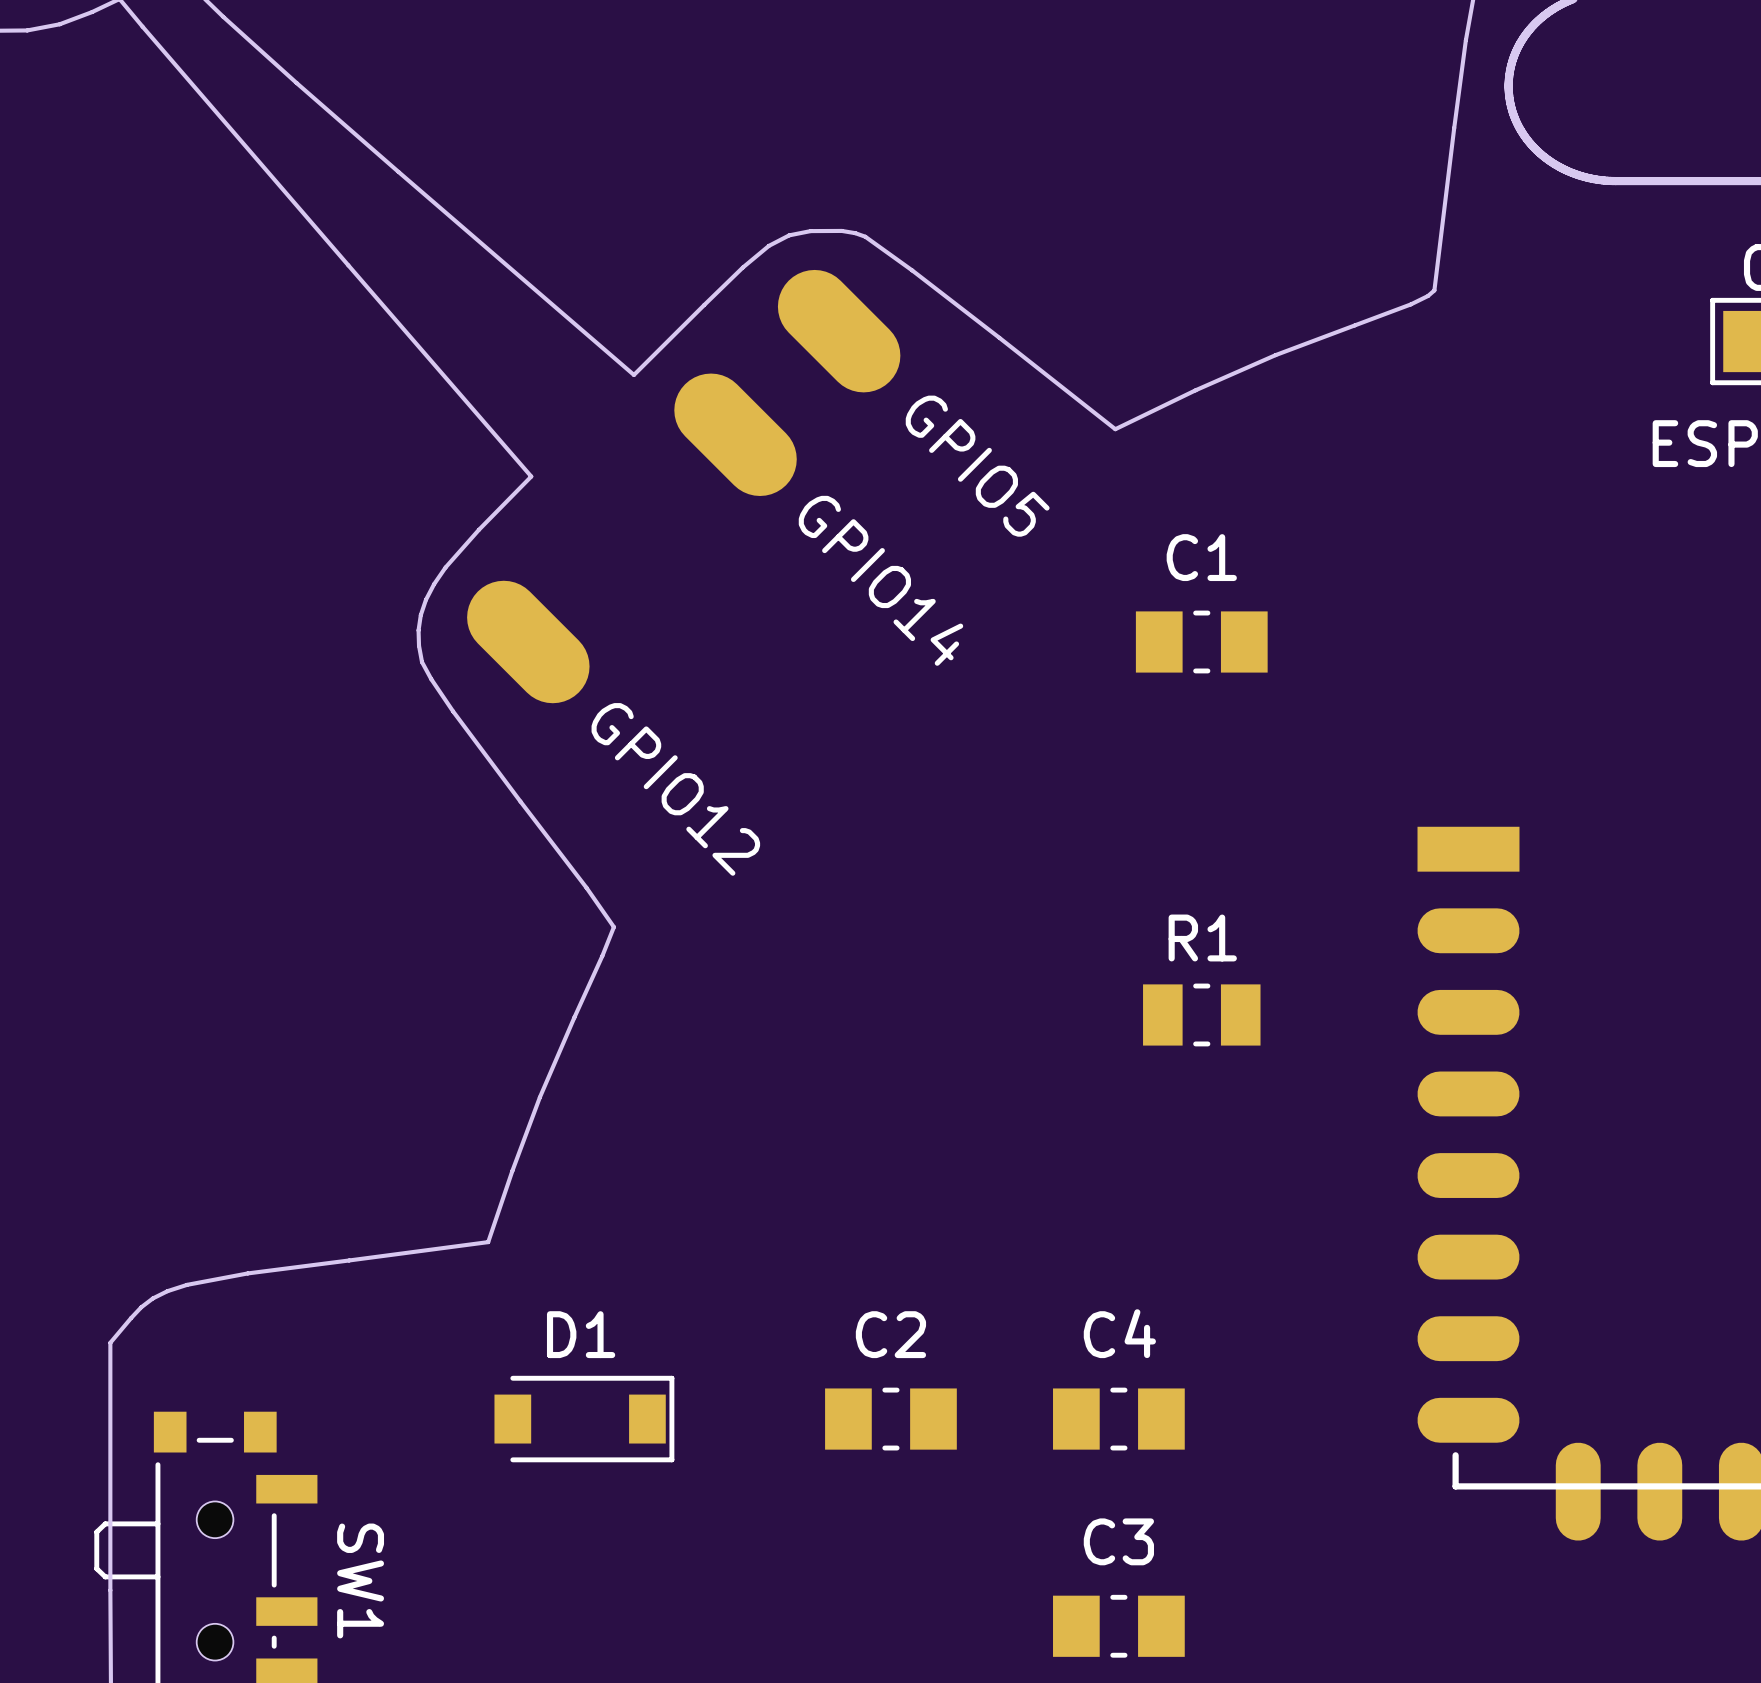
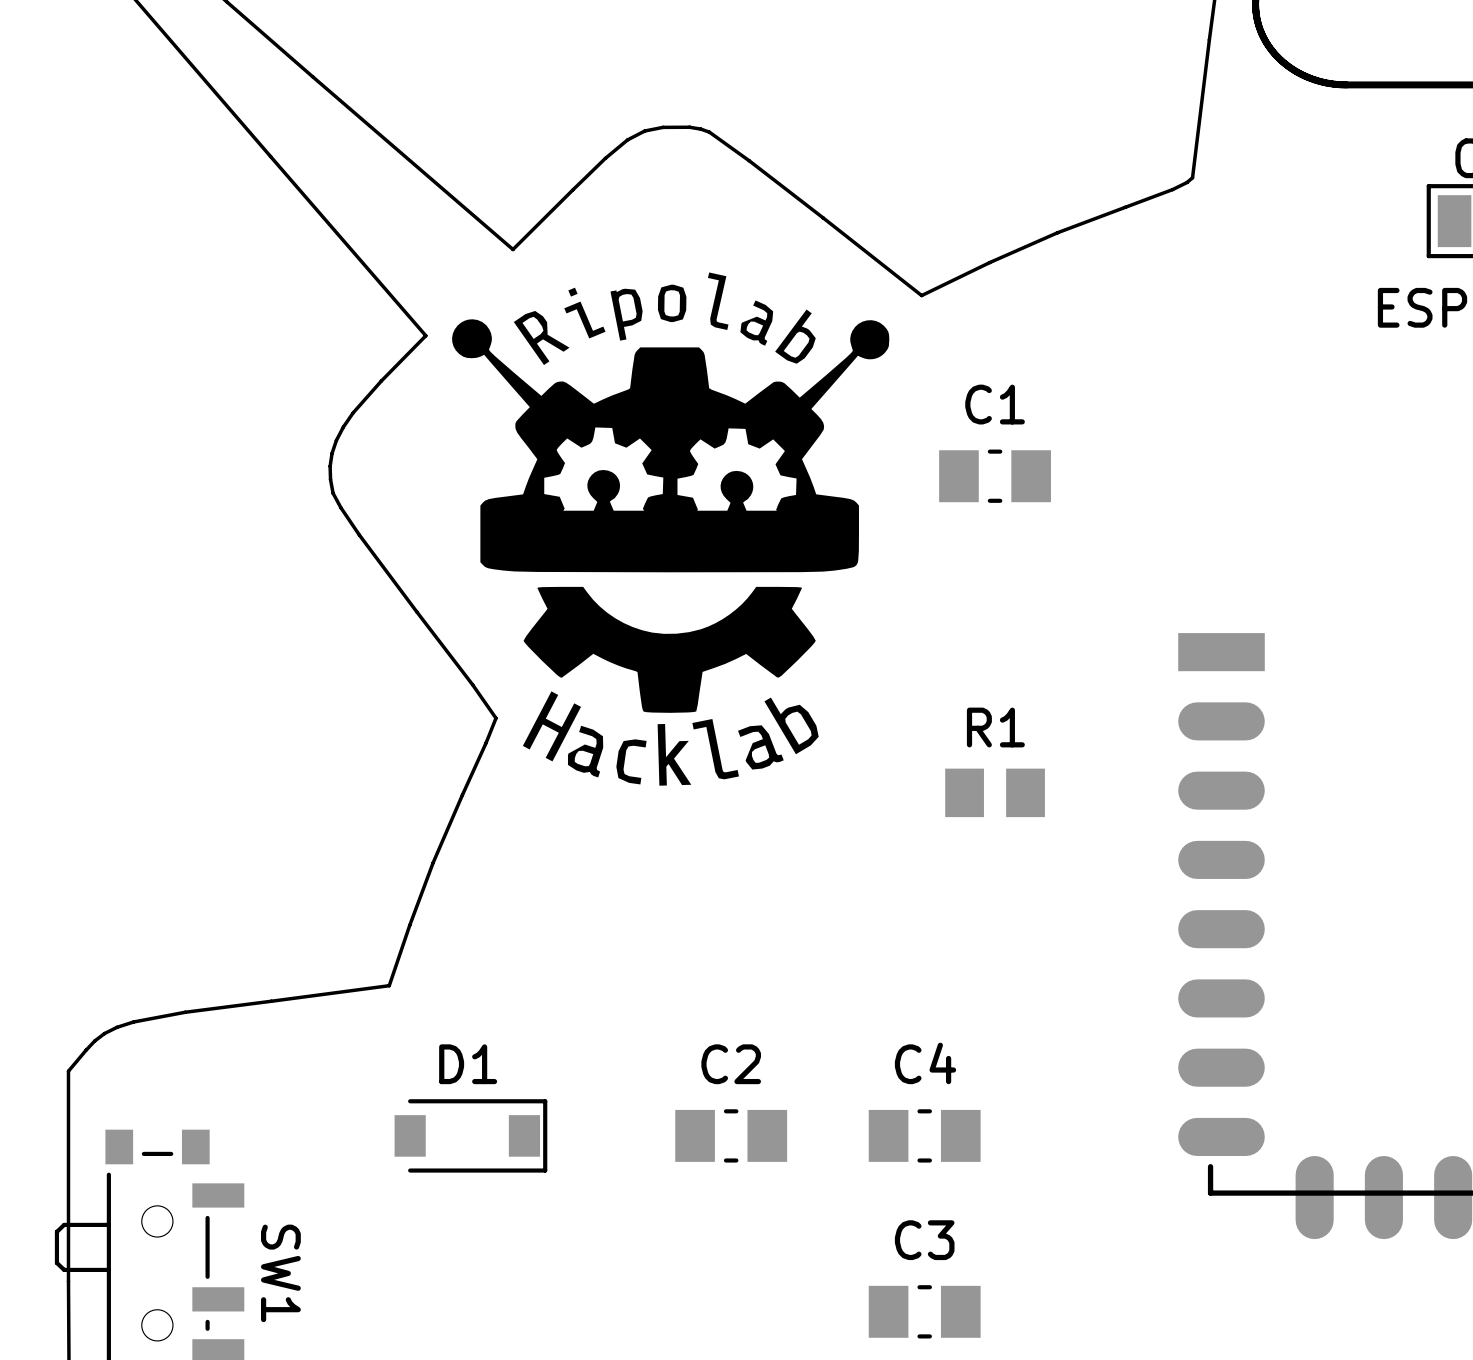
GPIO5: (839, 331) -> none
drawing: none -> [452, 272, 890, 786]
GPIO14: (735, 434) -> none
GPIO12: (528, 641) -> none
R1 footprint: [1143, 983, 1261, 1047] -> [945, 768, 1045, 818]

